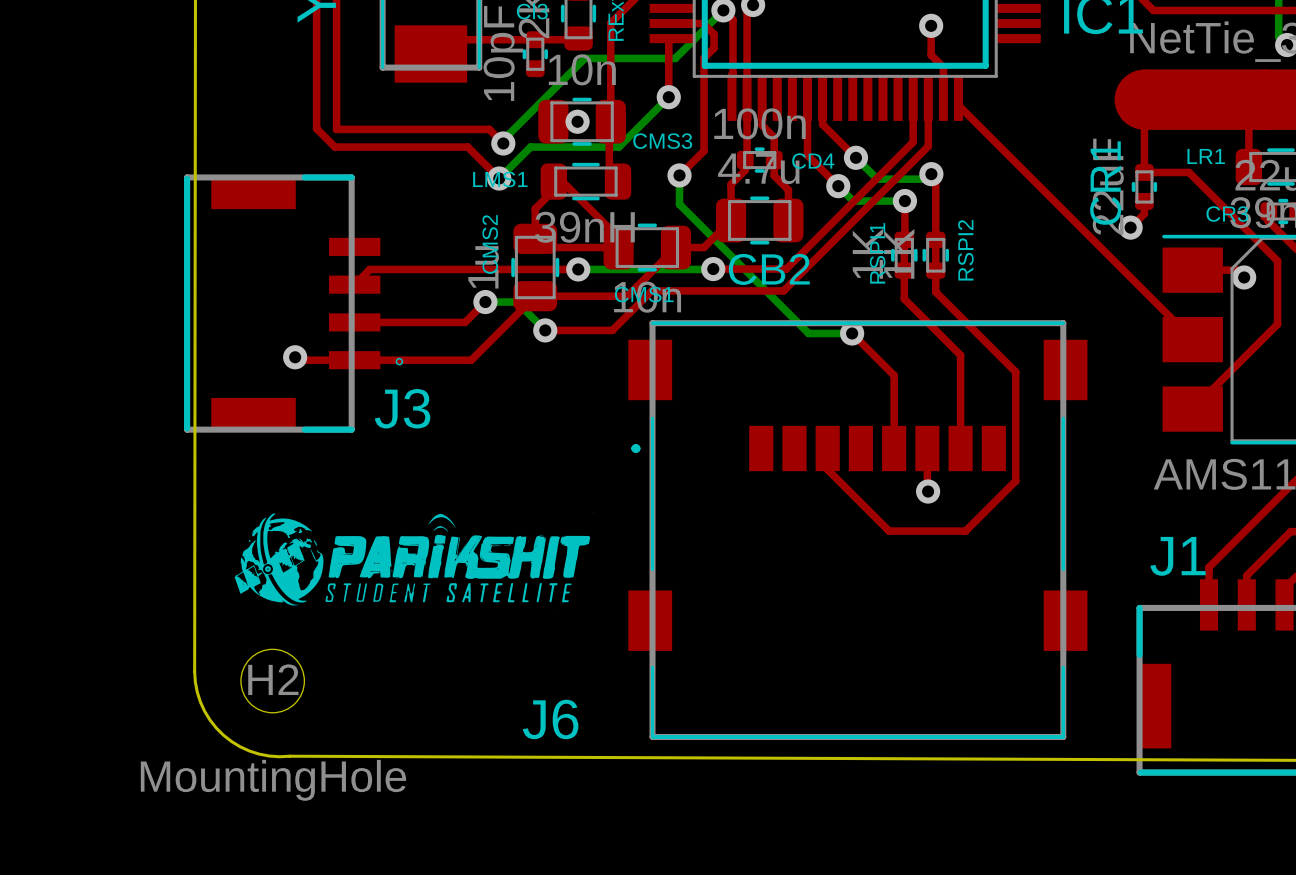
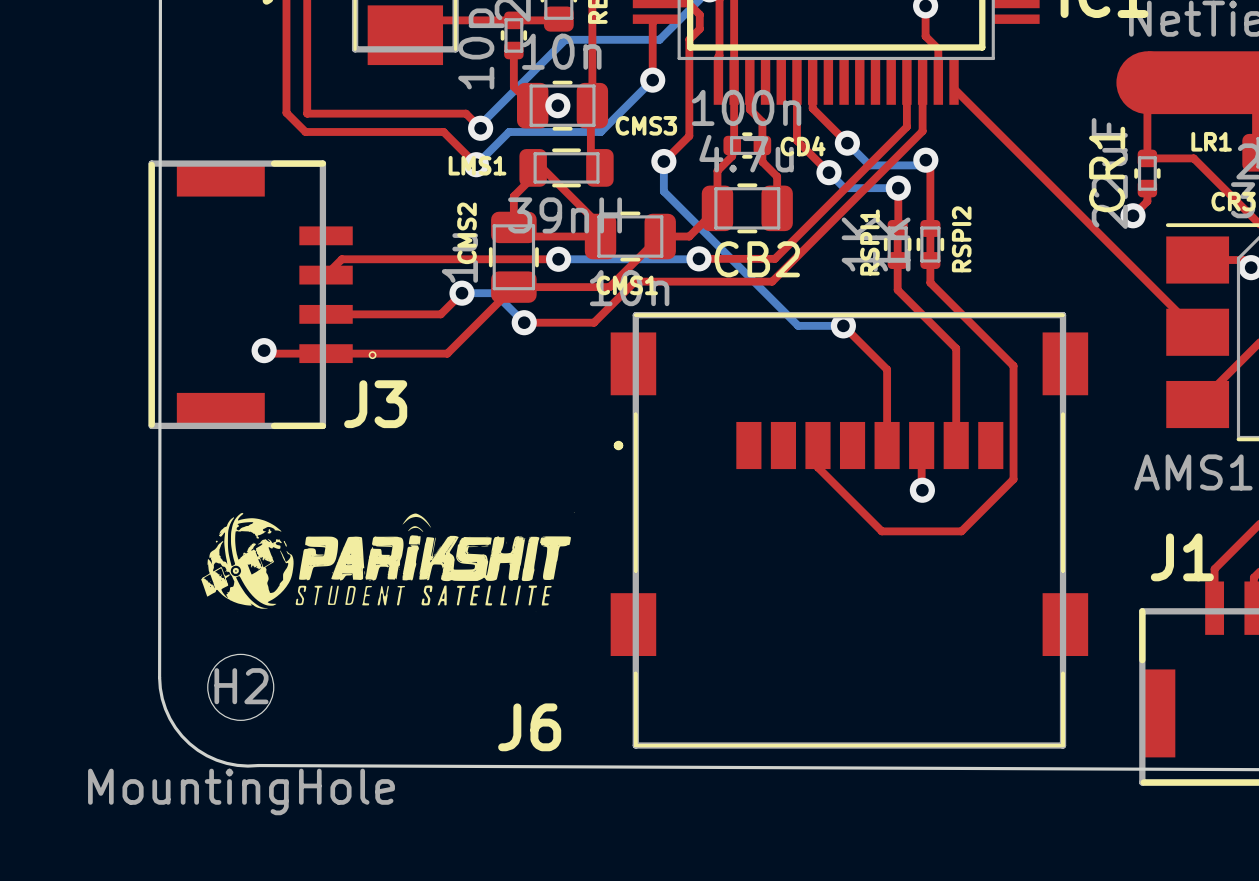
top track: none -> (513, 50) (513, 86) (532, 105)

